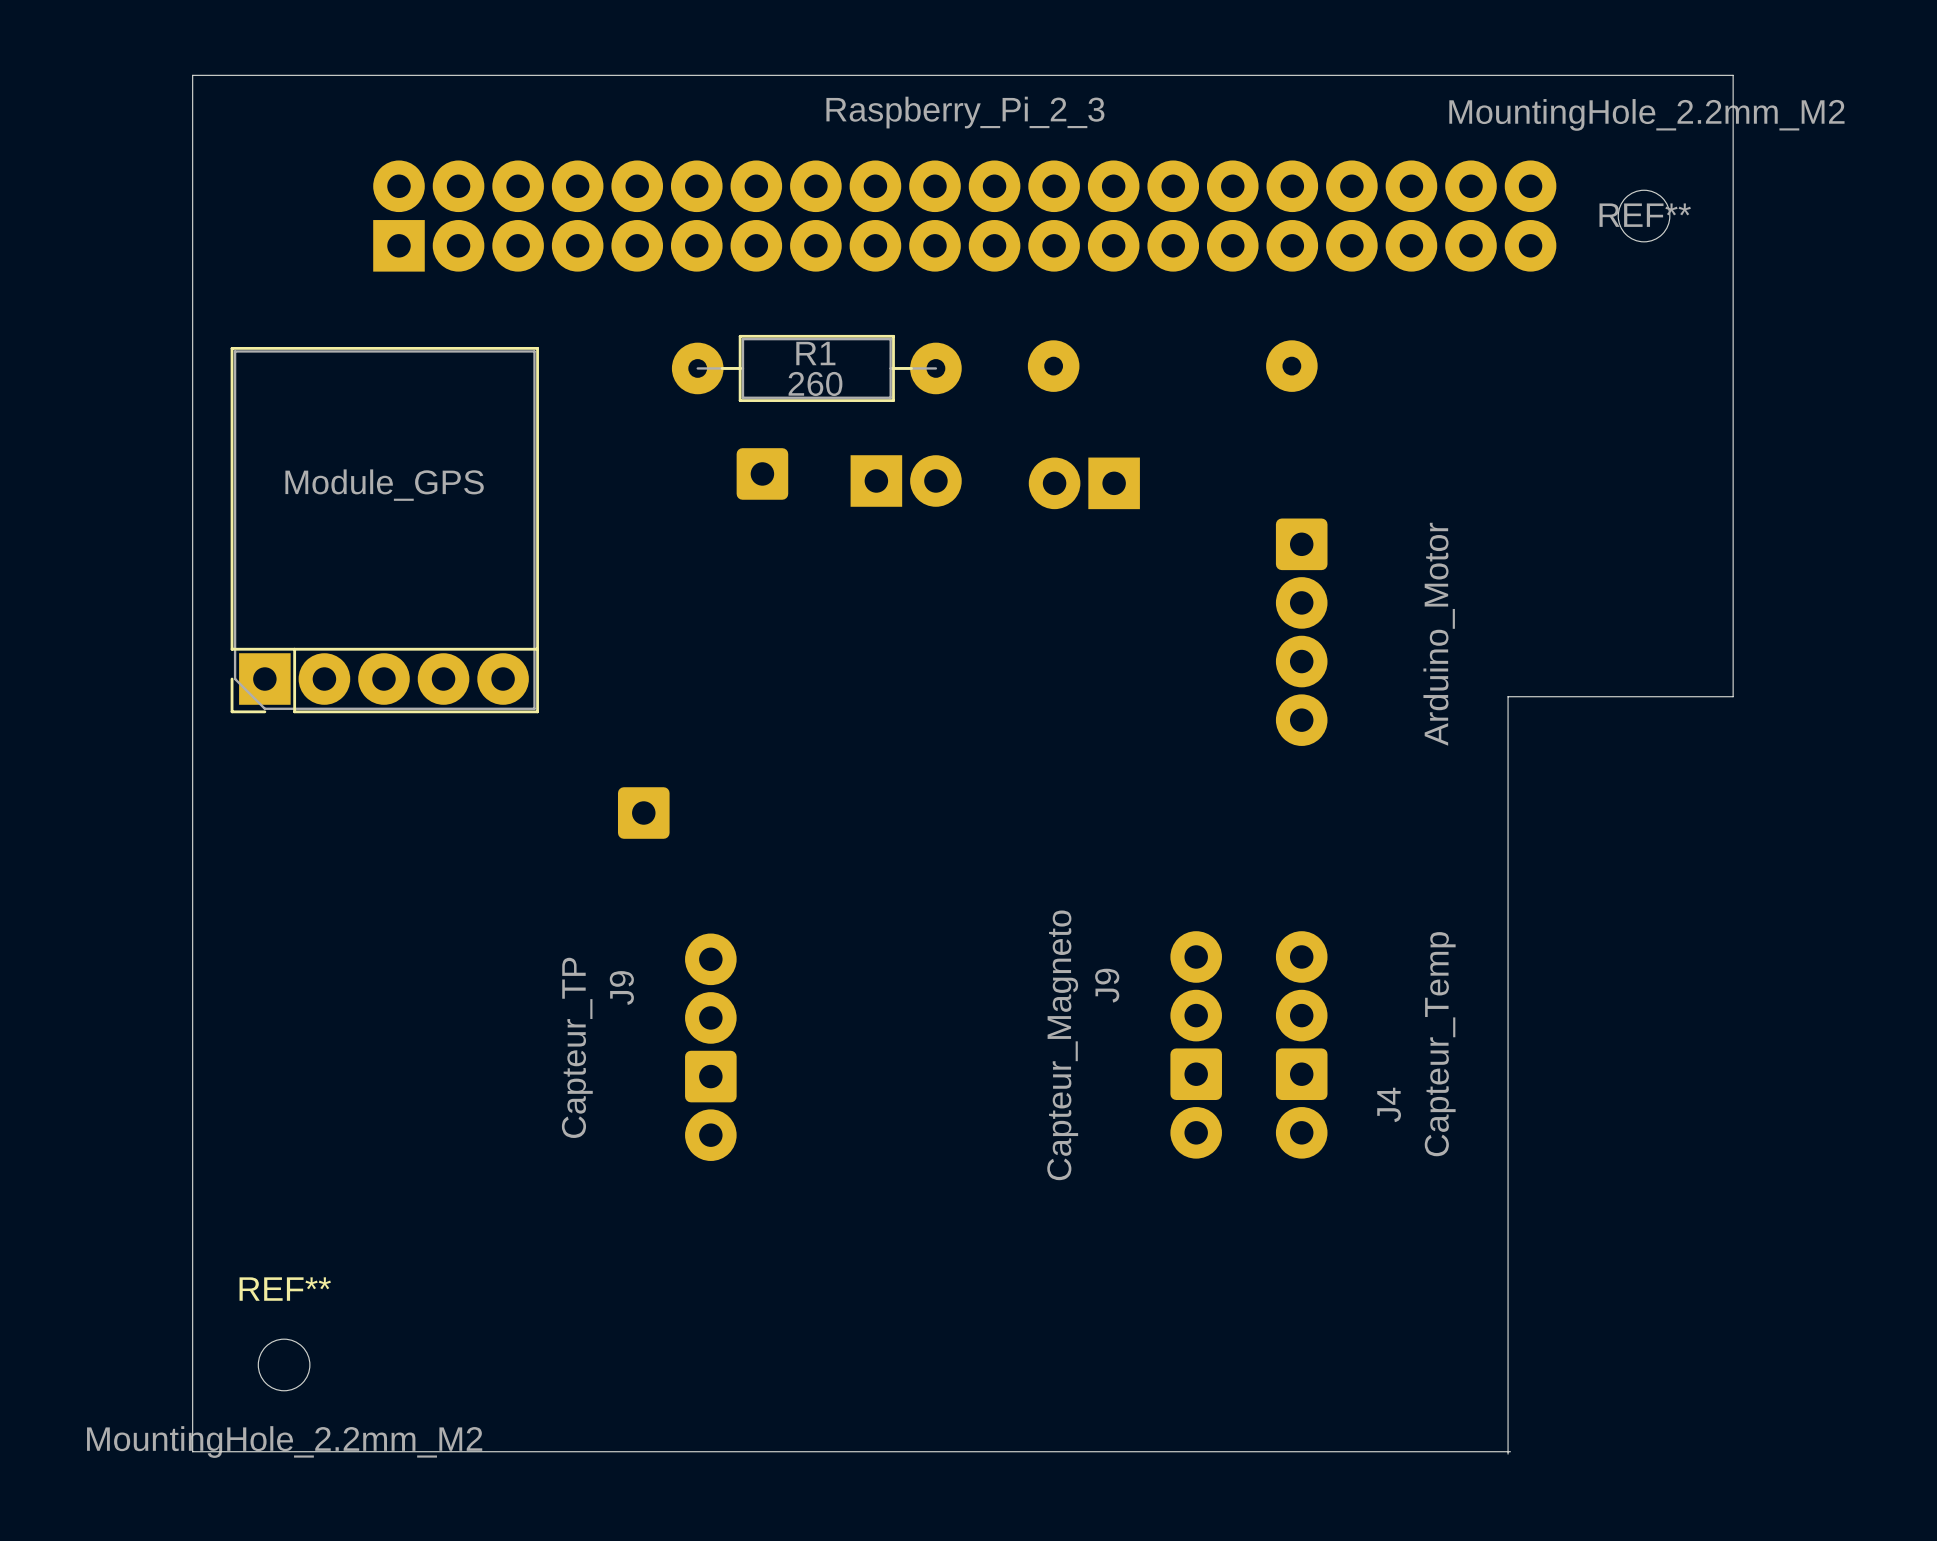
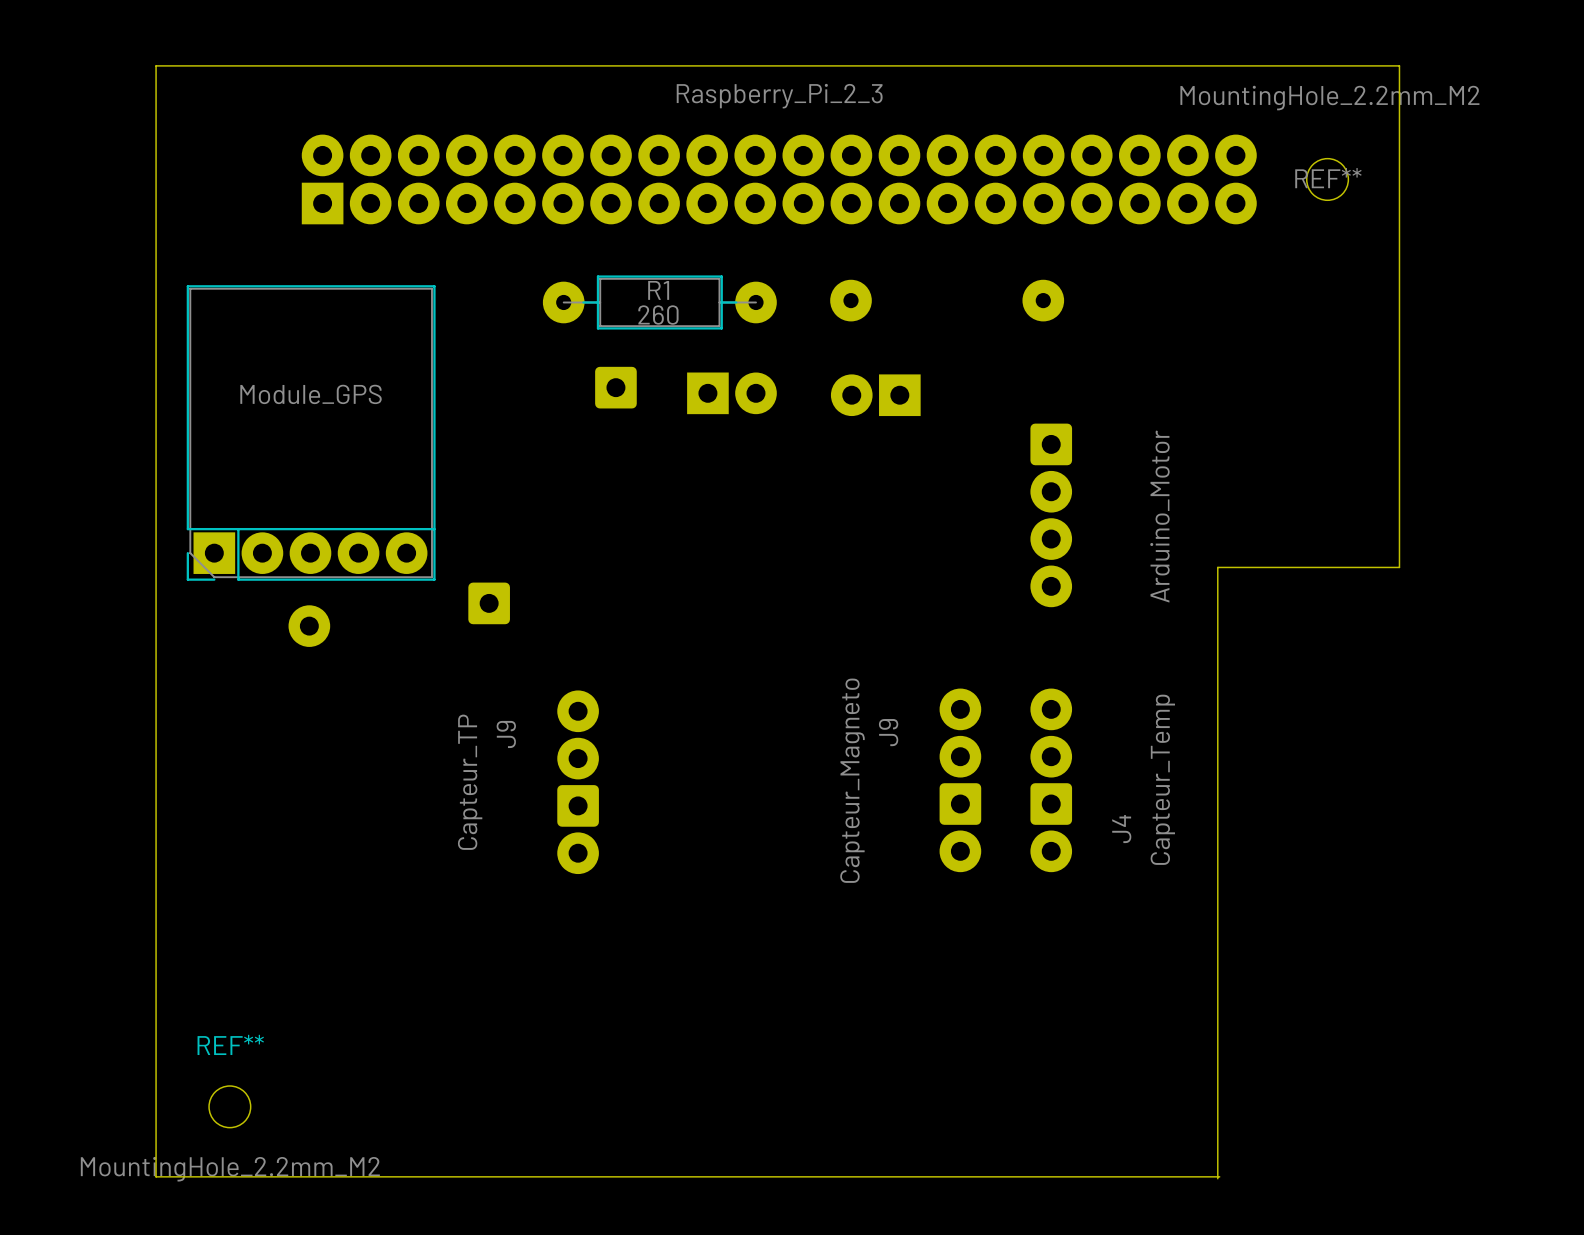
part: none -> (309, 626)
part position: (643, 813) -> (489, 603)
J9 position: (1196, 1044) -> (960, 780)
J4 position: (1301, 1044) -> (1051, 780)
J9 position: (710, 1047) -> (578, 782)

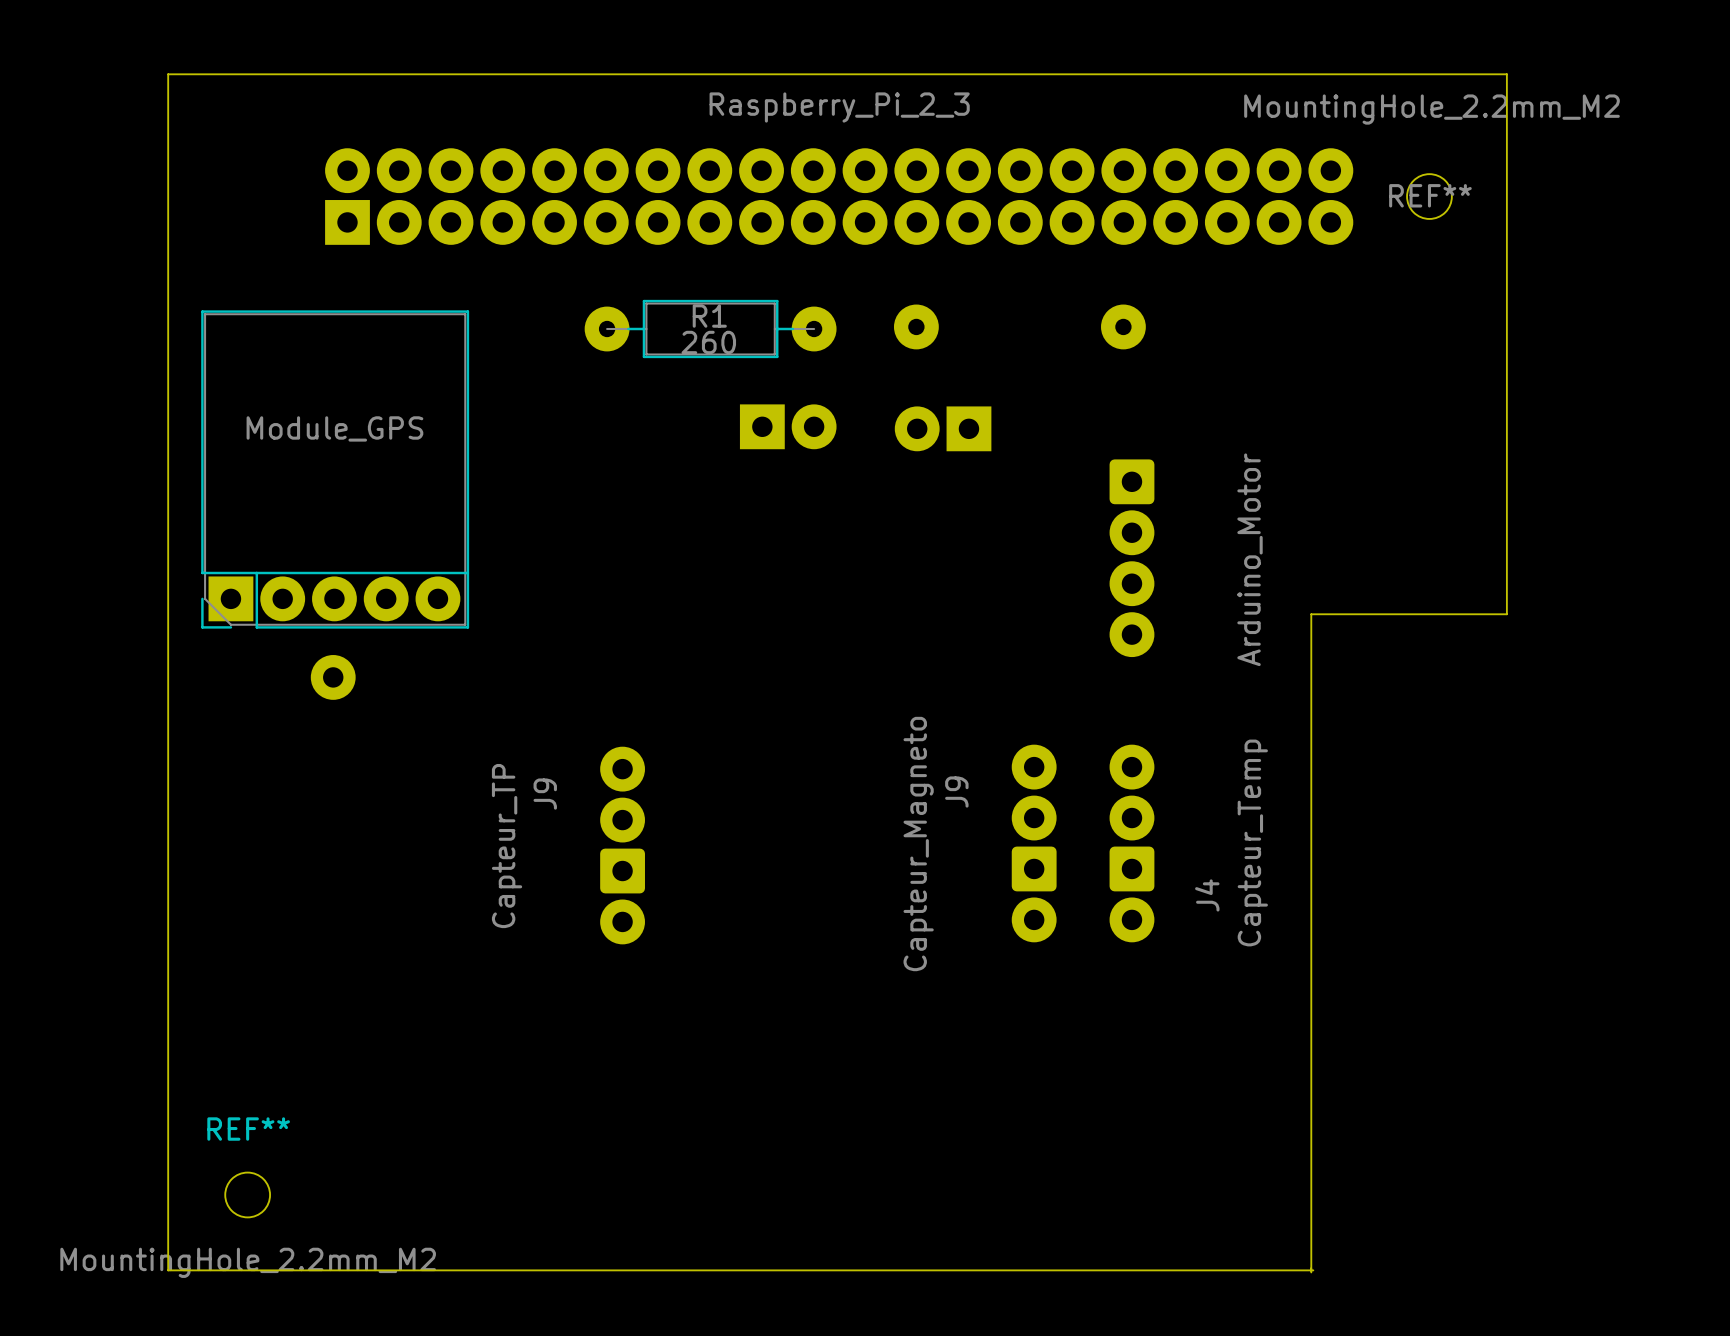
part: (615, 387) -> none
part: (489, 603) -> none

